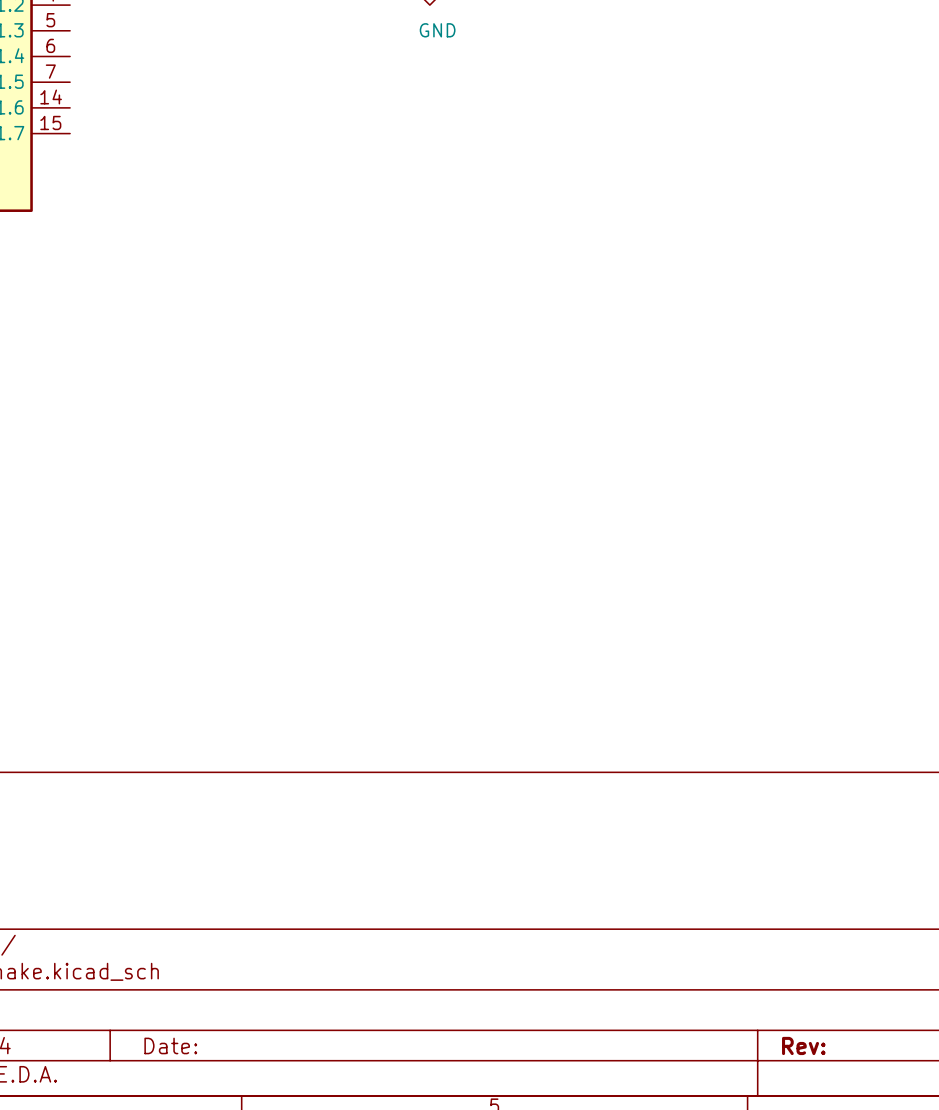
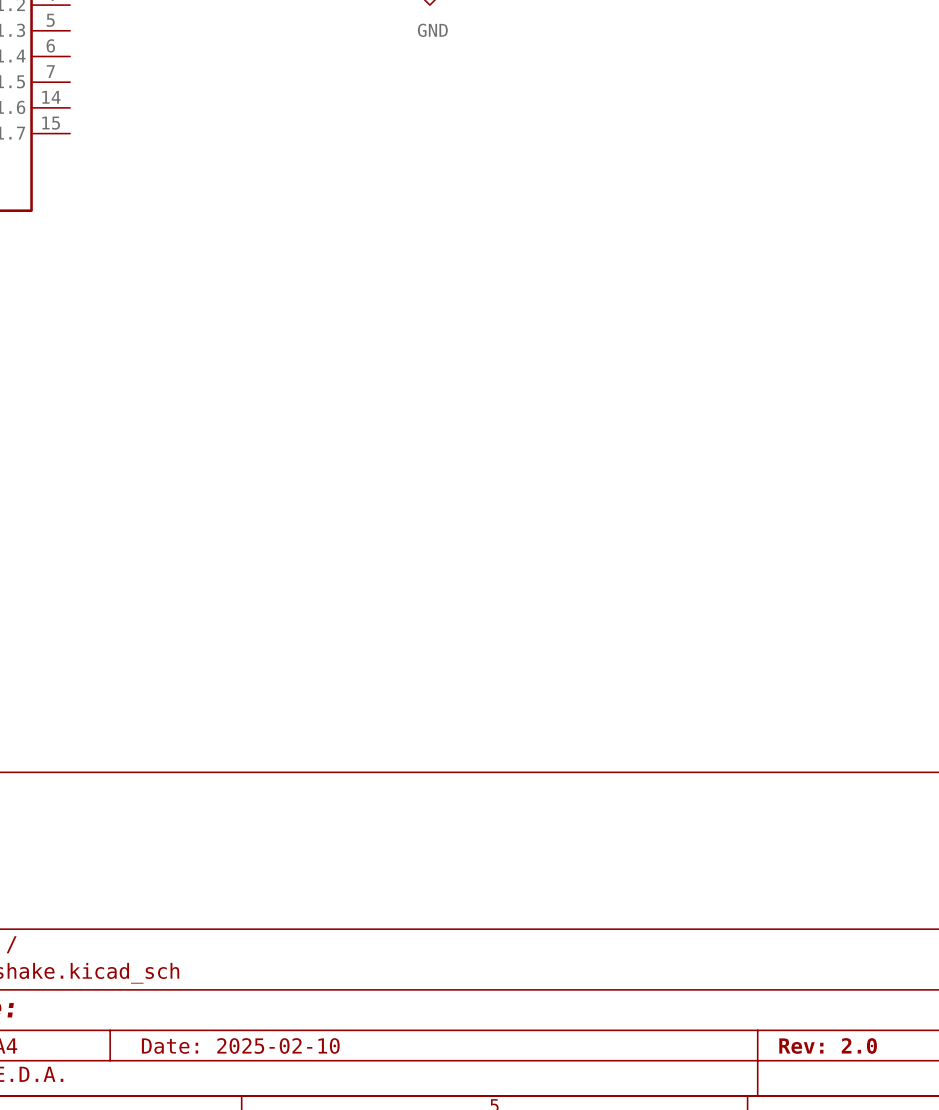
title block: Date: (170, 1045) -> Date: 2025-02-10 (240, 1045)
title block: Rev: (803, 1045) -> Rev: 2.0 (828, 1045)

